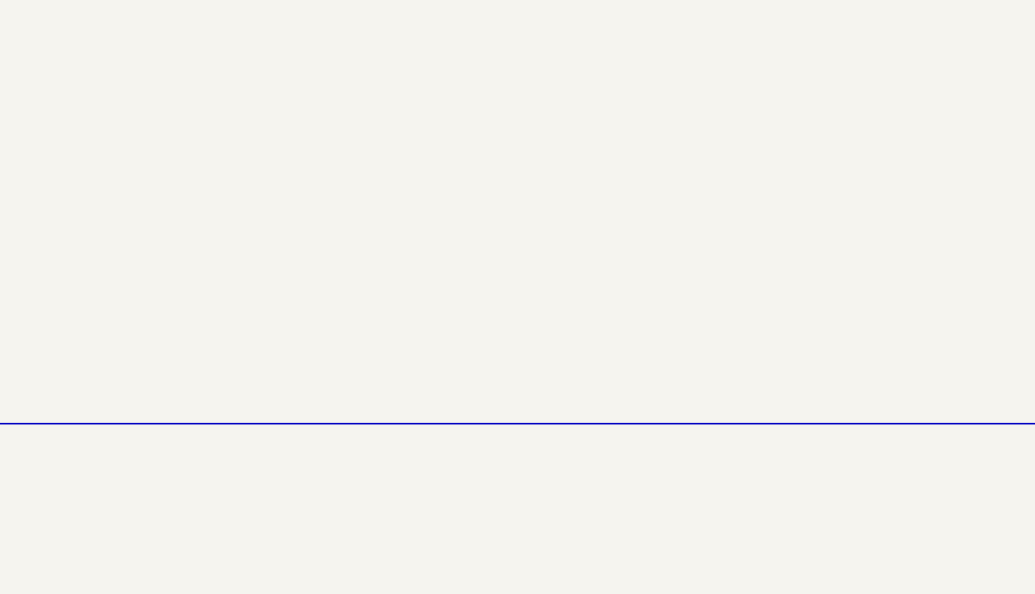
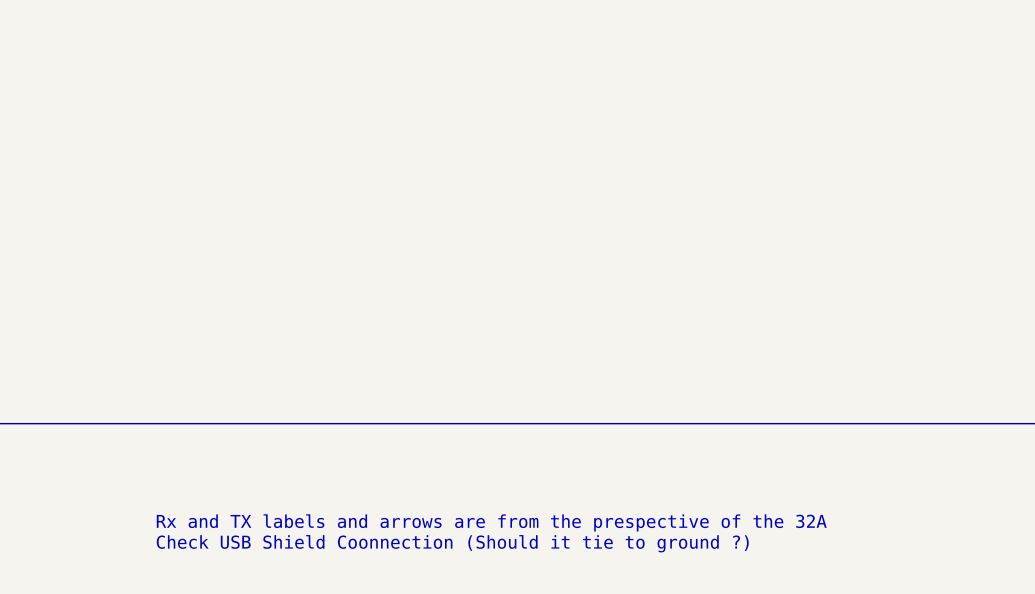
text: none -> Rx and TX labels and arrows are from the prespective of the 32A (491, 522)
text: none -> Check USB Shield Coonnection (Should it tie to ground ?) (452, 543)

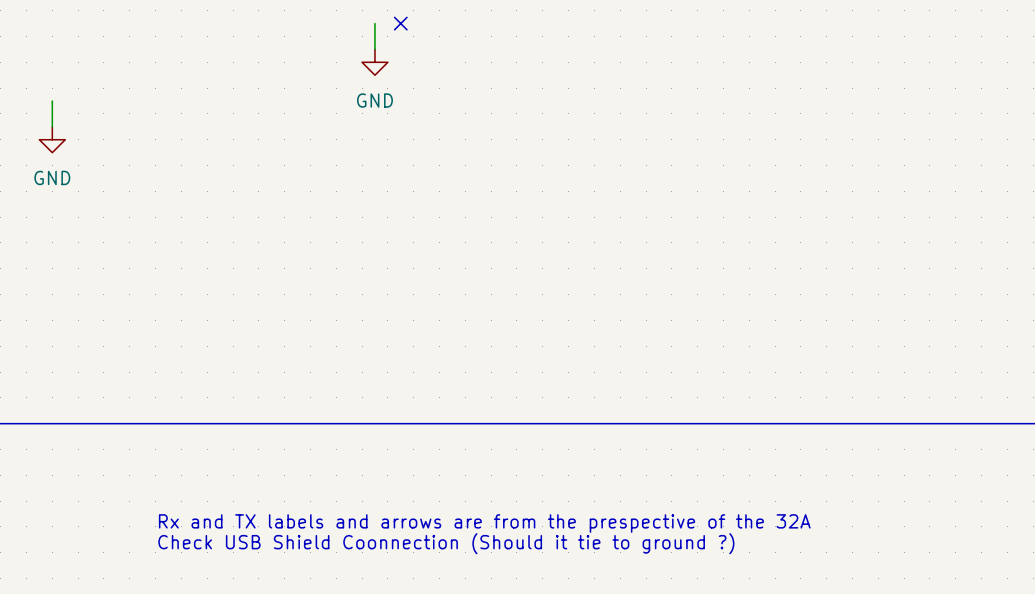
wire: none -> (374, 23) (374, 49)
no-connect mark: none -> (400, 23)
power symbol: none -> GND (374, 62)
wire: none -> (52, 101) (52, 126)
power symbol: none -> GND (52, 139)

